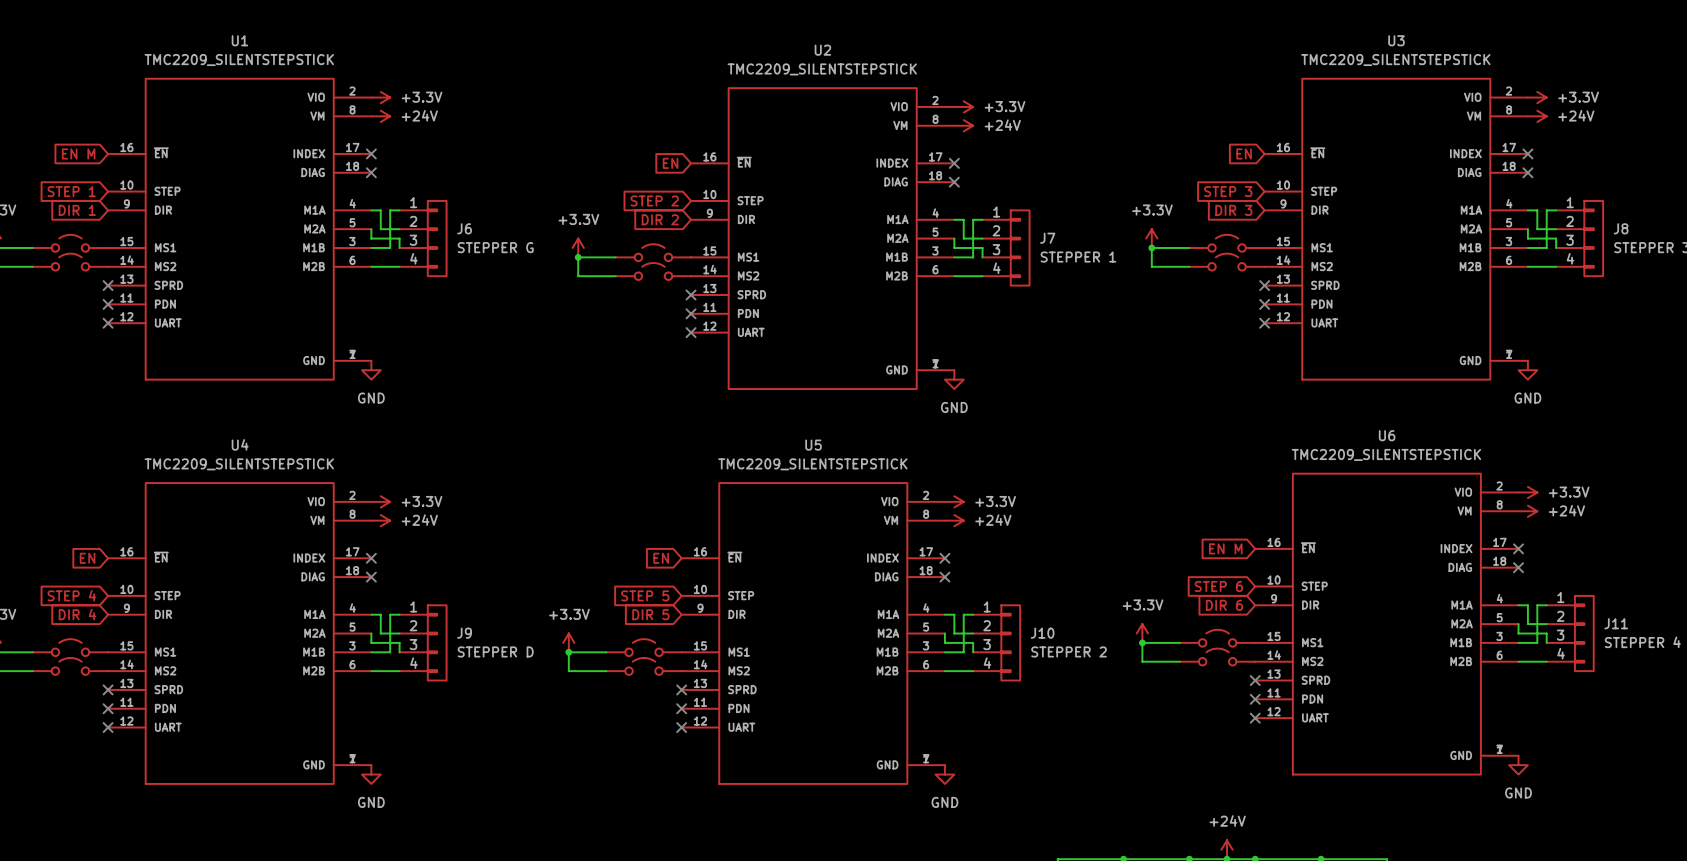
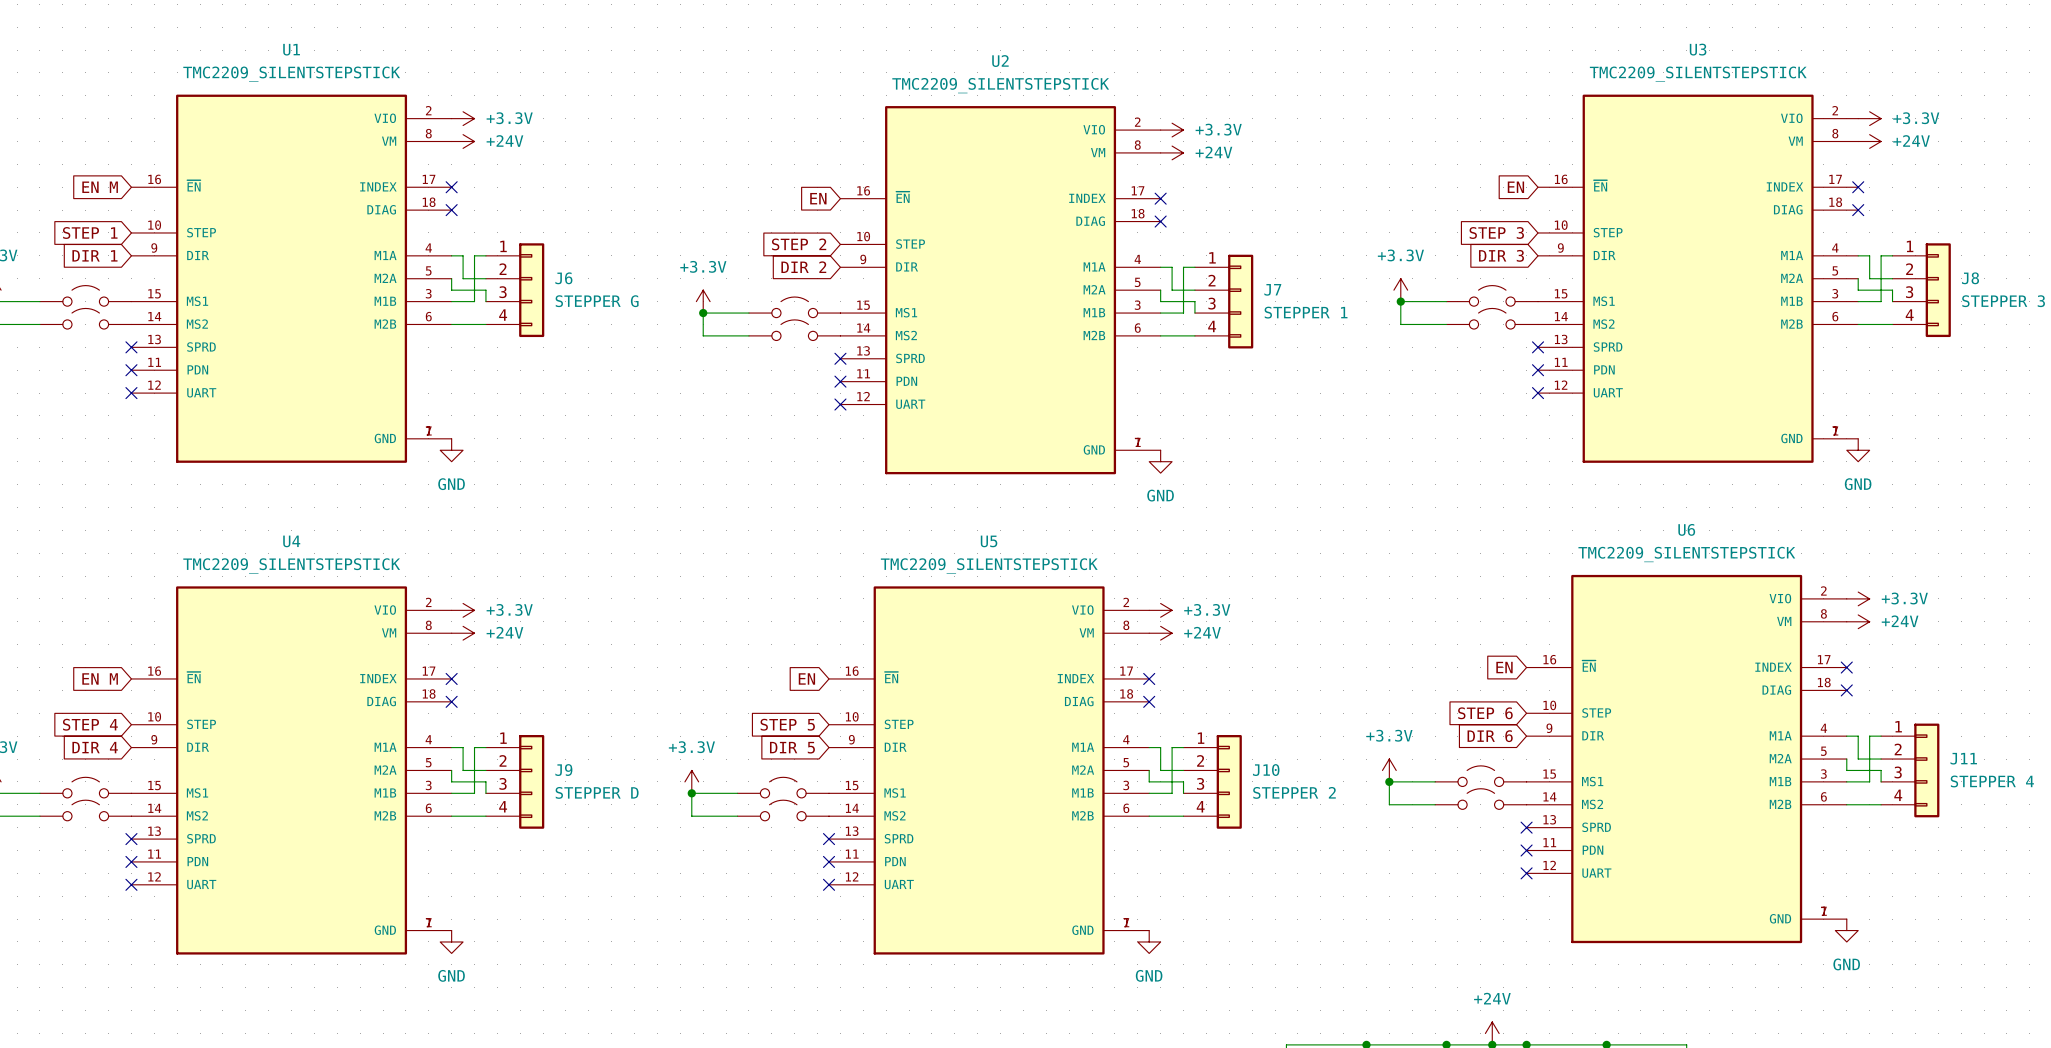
global label: EN M (1225, 548) -> EN (1504, 667)
global label: EN (87, 558) -> EN M (100, 678)

